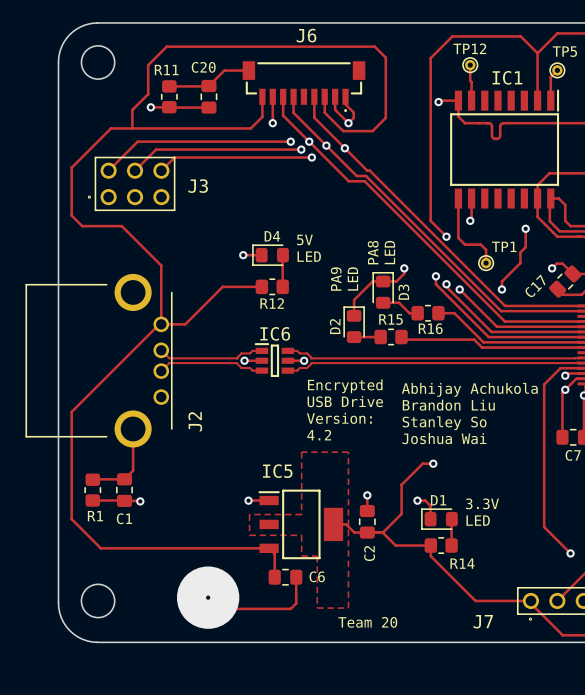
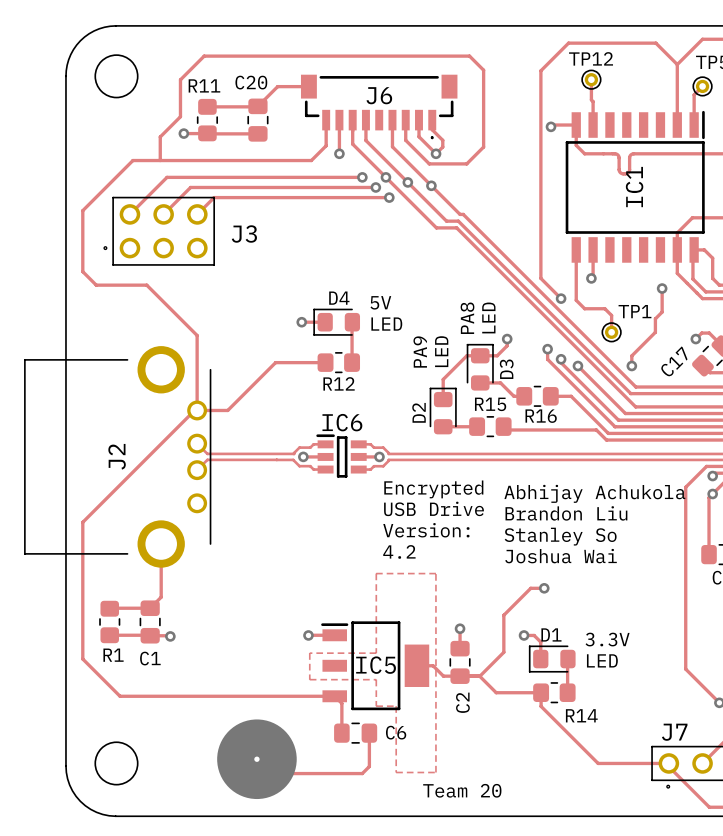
J6 name position: J6 (306, 35) -> J6 (379, 95)
IC1 name rotation: 0° (507, 77) -> 90° counterclockwise (634, 187)
IC1 name position: IC1 (507, 77) -> IC1 (634, 187)
J2 name position: J2 (195, 421) -> J2 (117, 456)
IC5 name position: IC5 (277, 471) -> IC5 (376, 665)
J7 name position: J7 (483, 621) -> J7 (674, 732)

